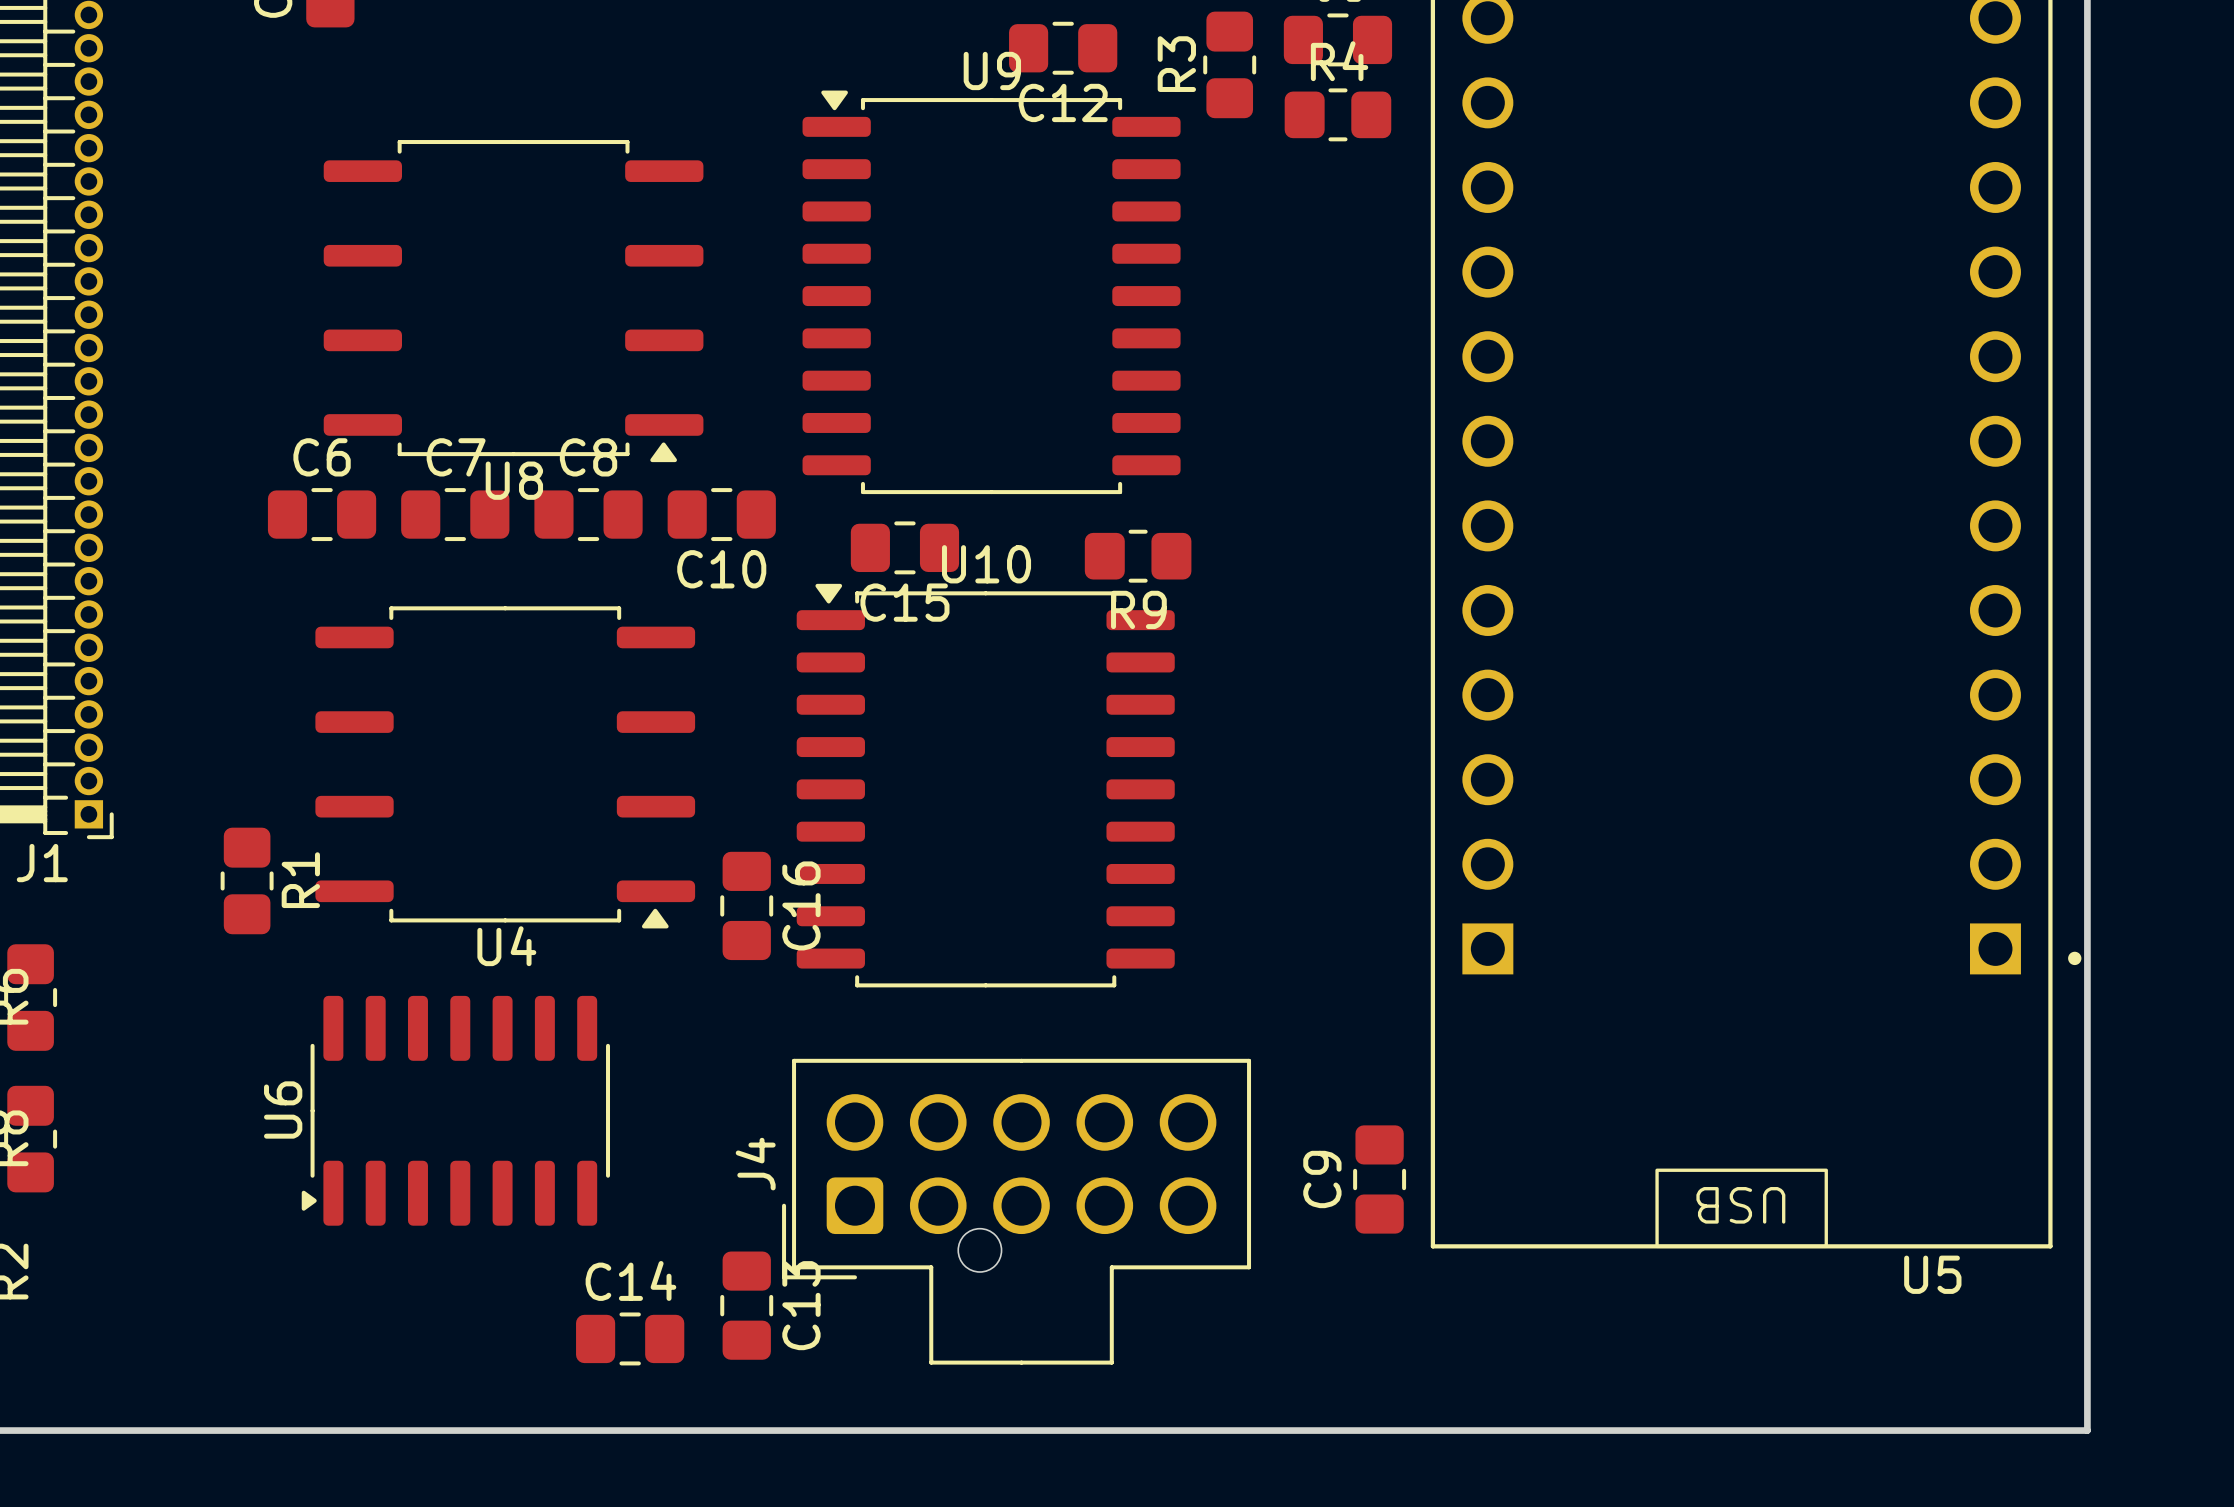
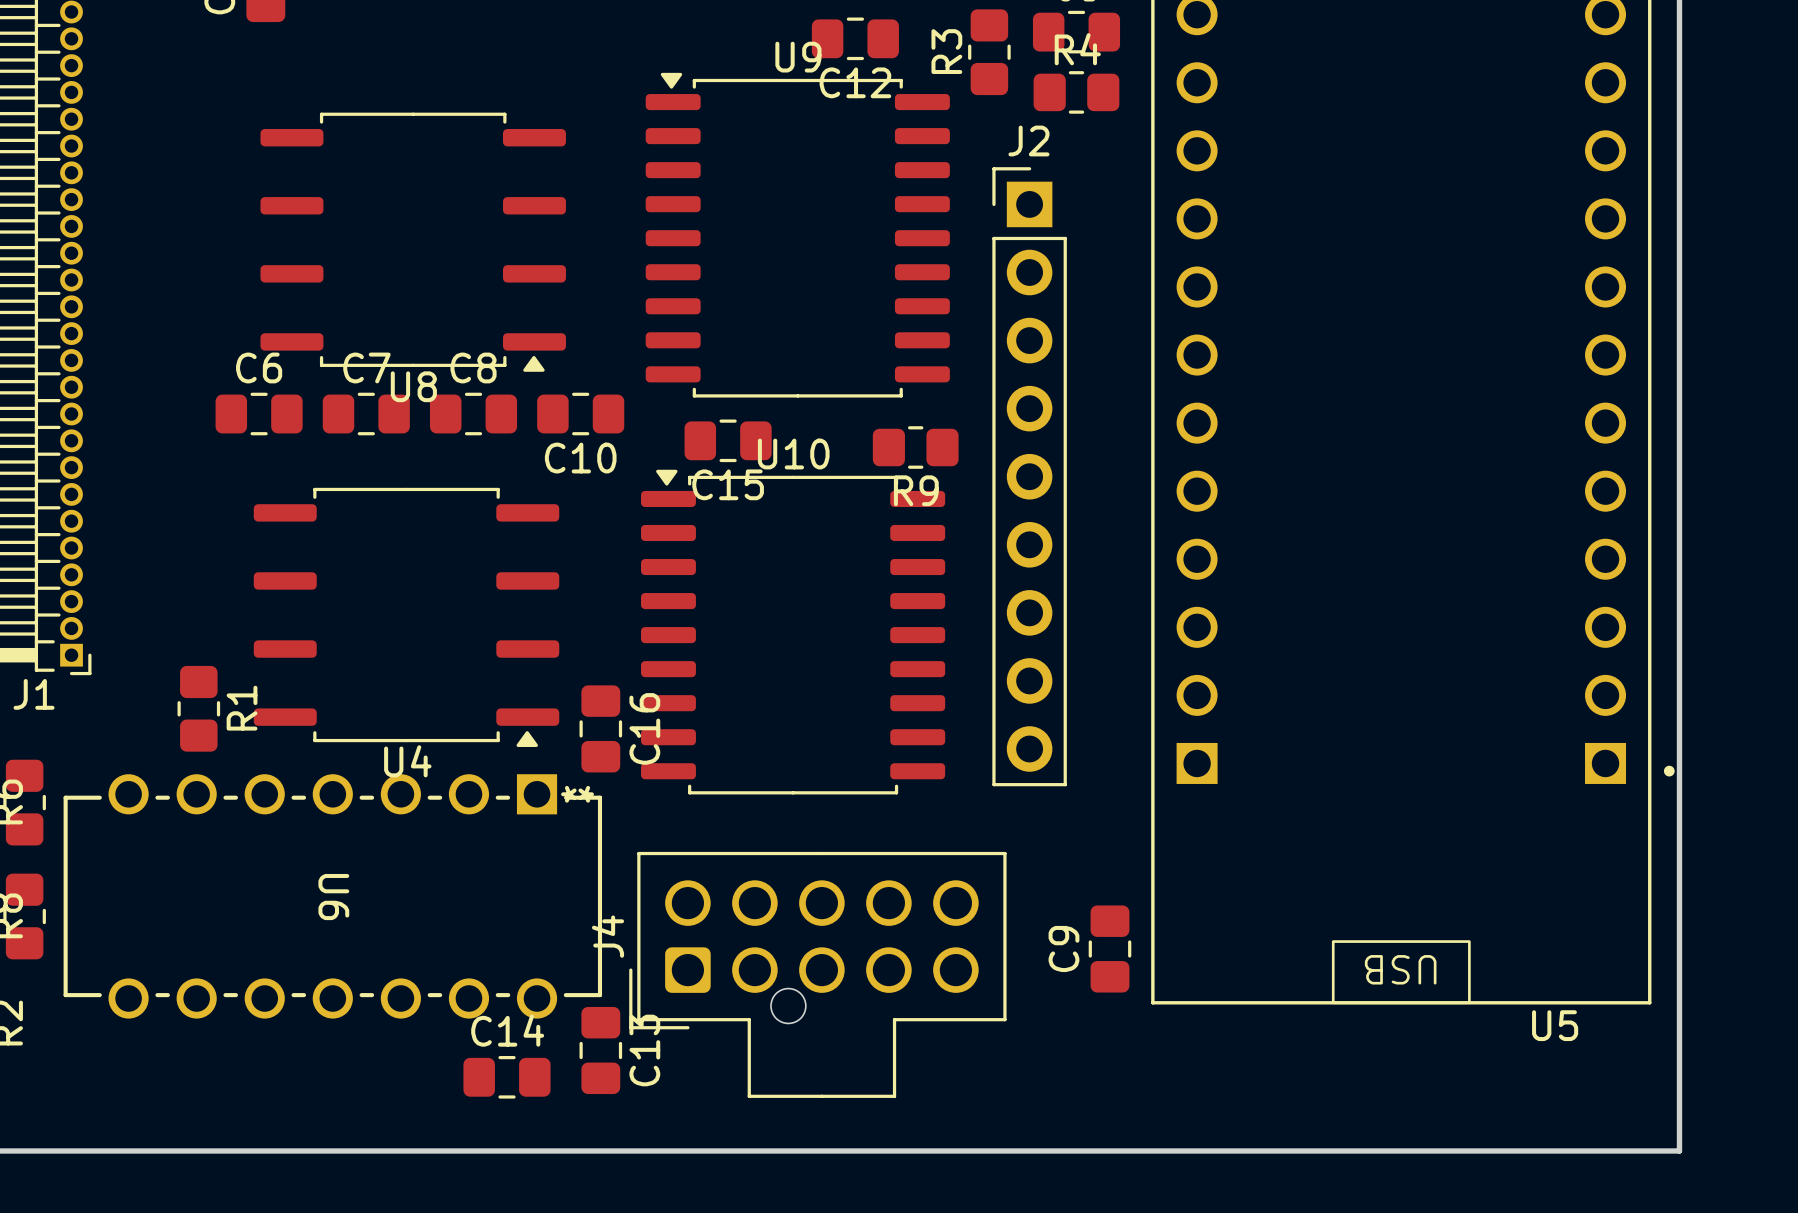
J2: none -> (1029, 476)
U6 footprint: [301, 995, 611, 1226] -> [63, 774, 603, 1019]
U6 name position: U6 (283, 1109) -> U6 (333, 897)

